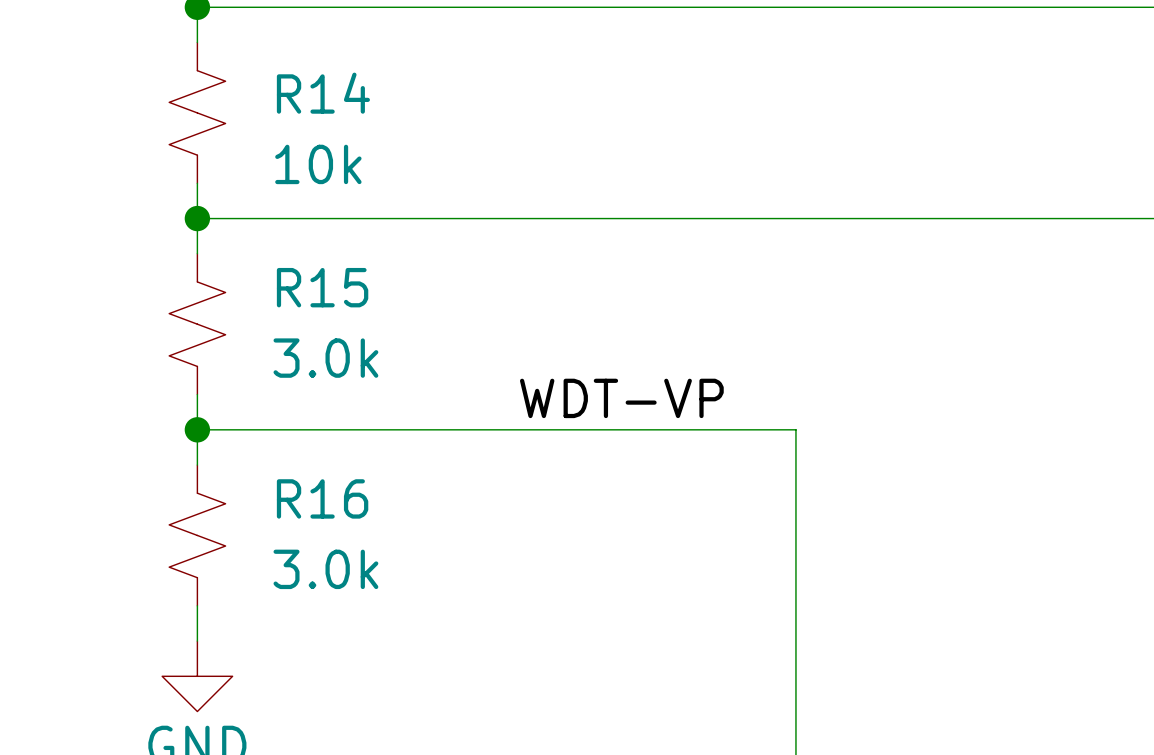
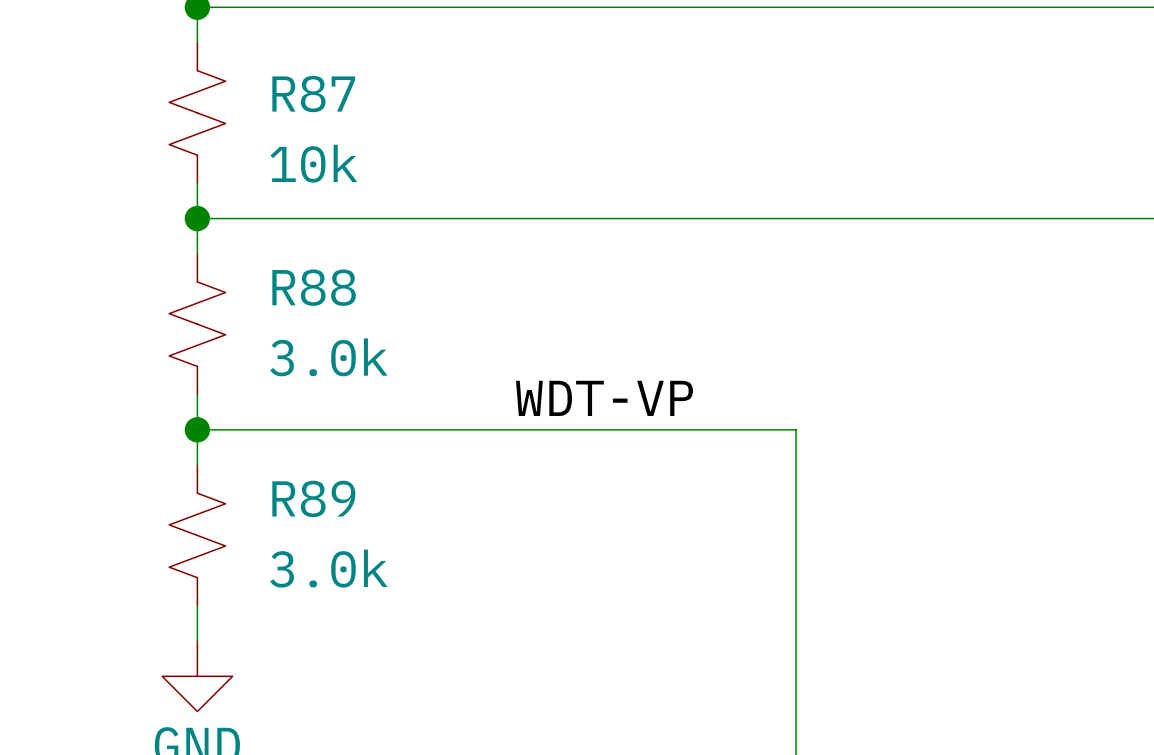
R14 name: R14 (323, 93) -> R87 (313, 94)
R15 name: R15 (322, 287) -> R88 (314, 287)
R16 name: R16 (322, 498) -> R89 (313, 498)

